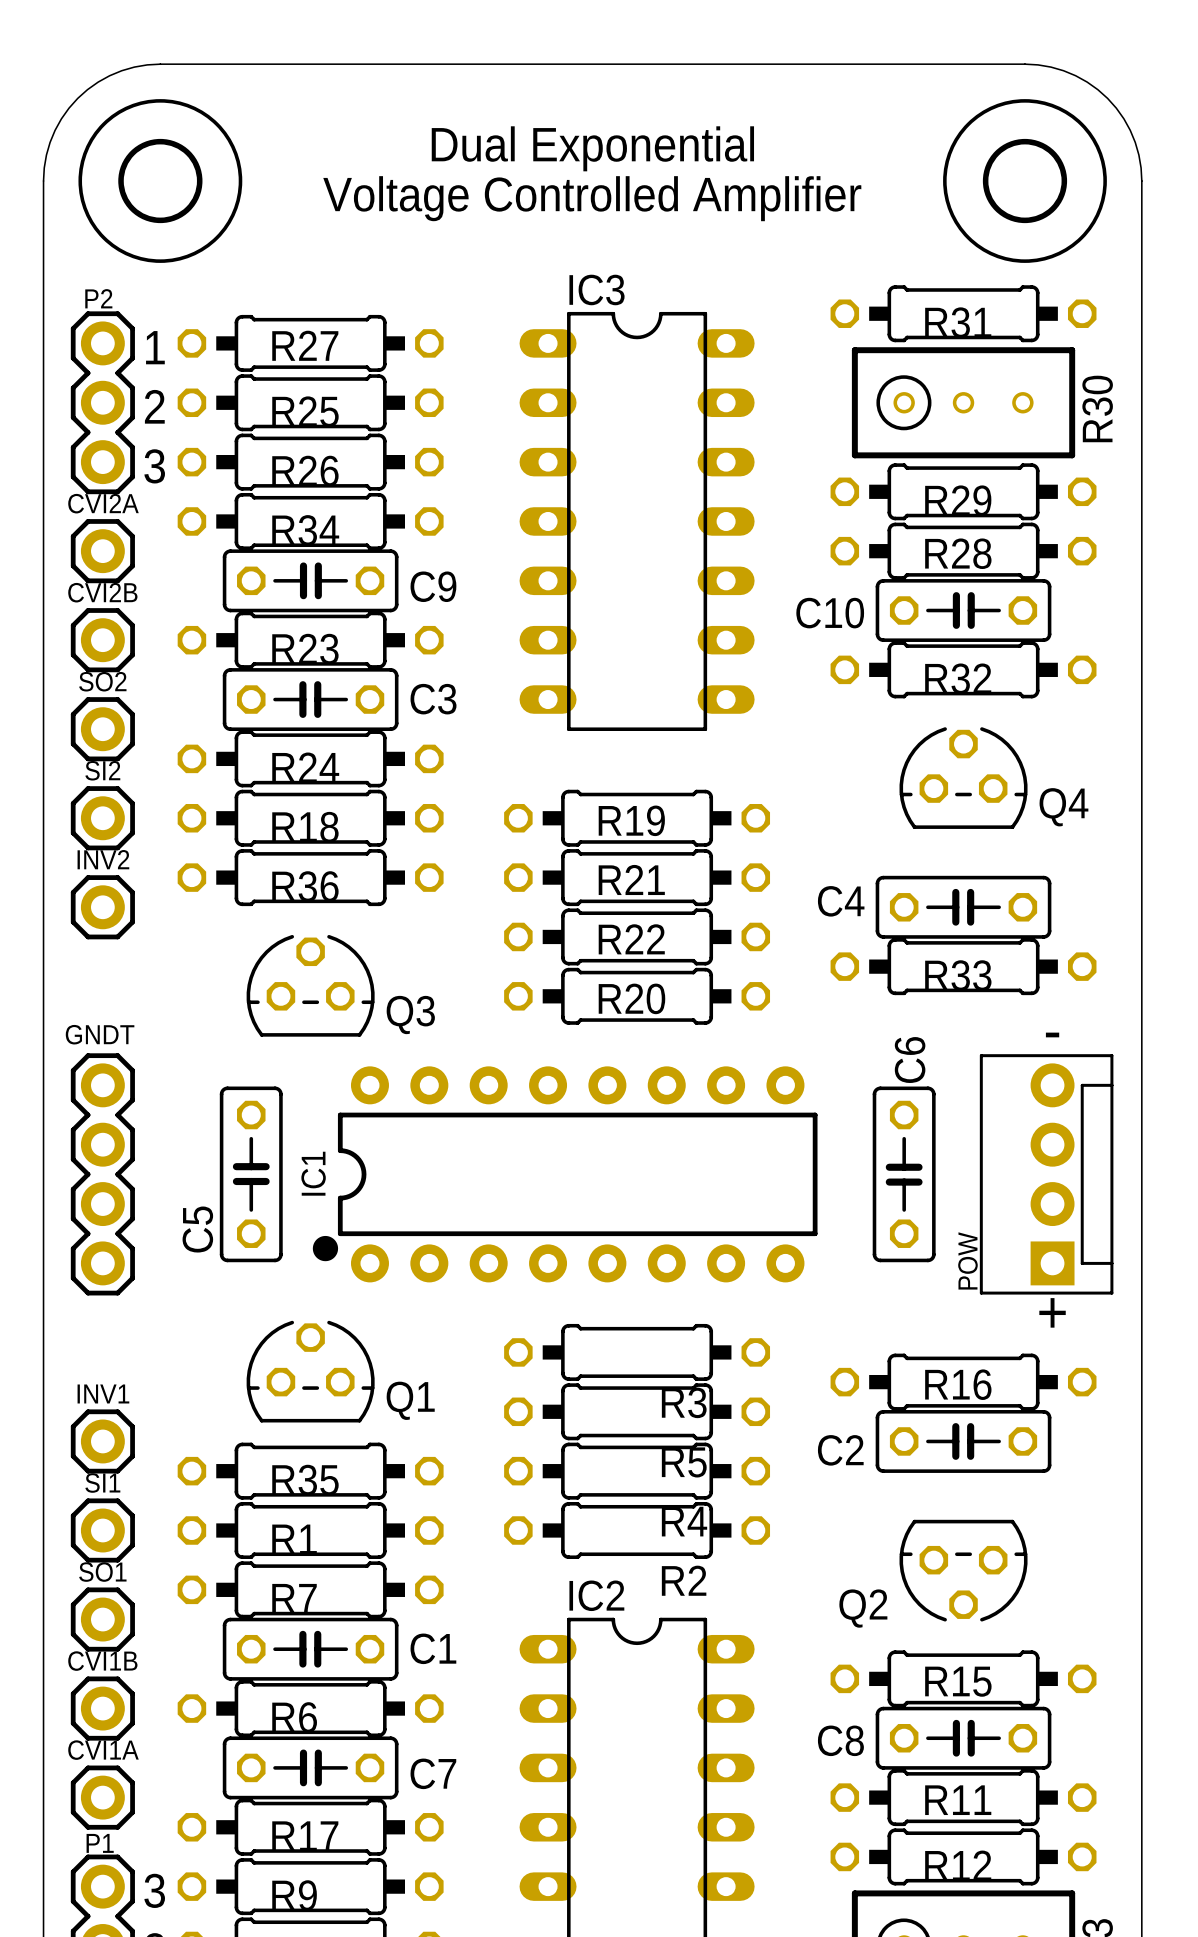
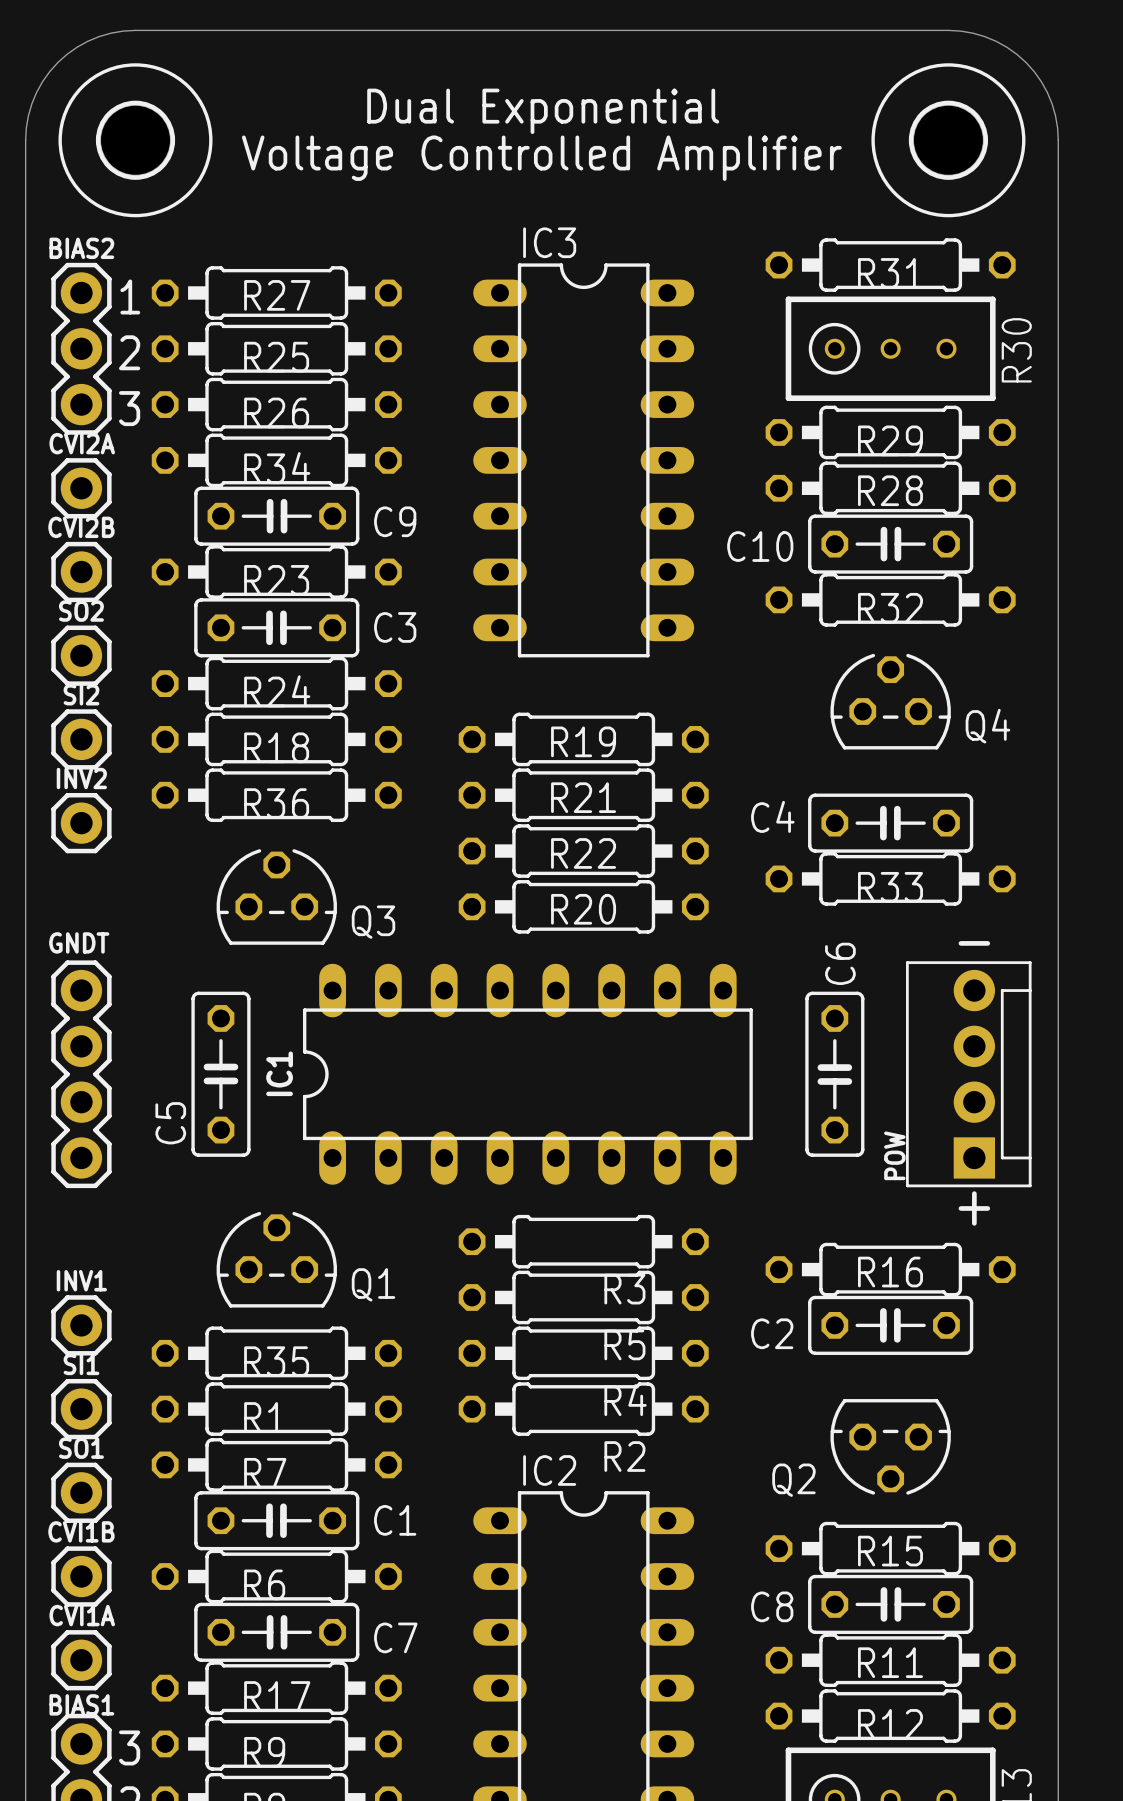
P2 name: P2 (98, 298) -> BIAS2 (81, 248)
IC1 footprint: [312, 1066, 818, 1283] -> [303, 963, 753, 1185]
P1 name: P1 (100, 1843) -> BIAS1 (81, 1704)

